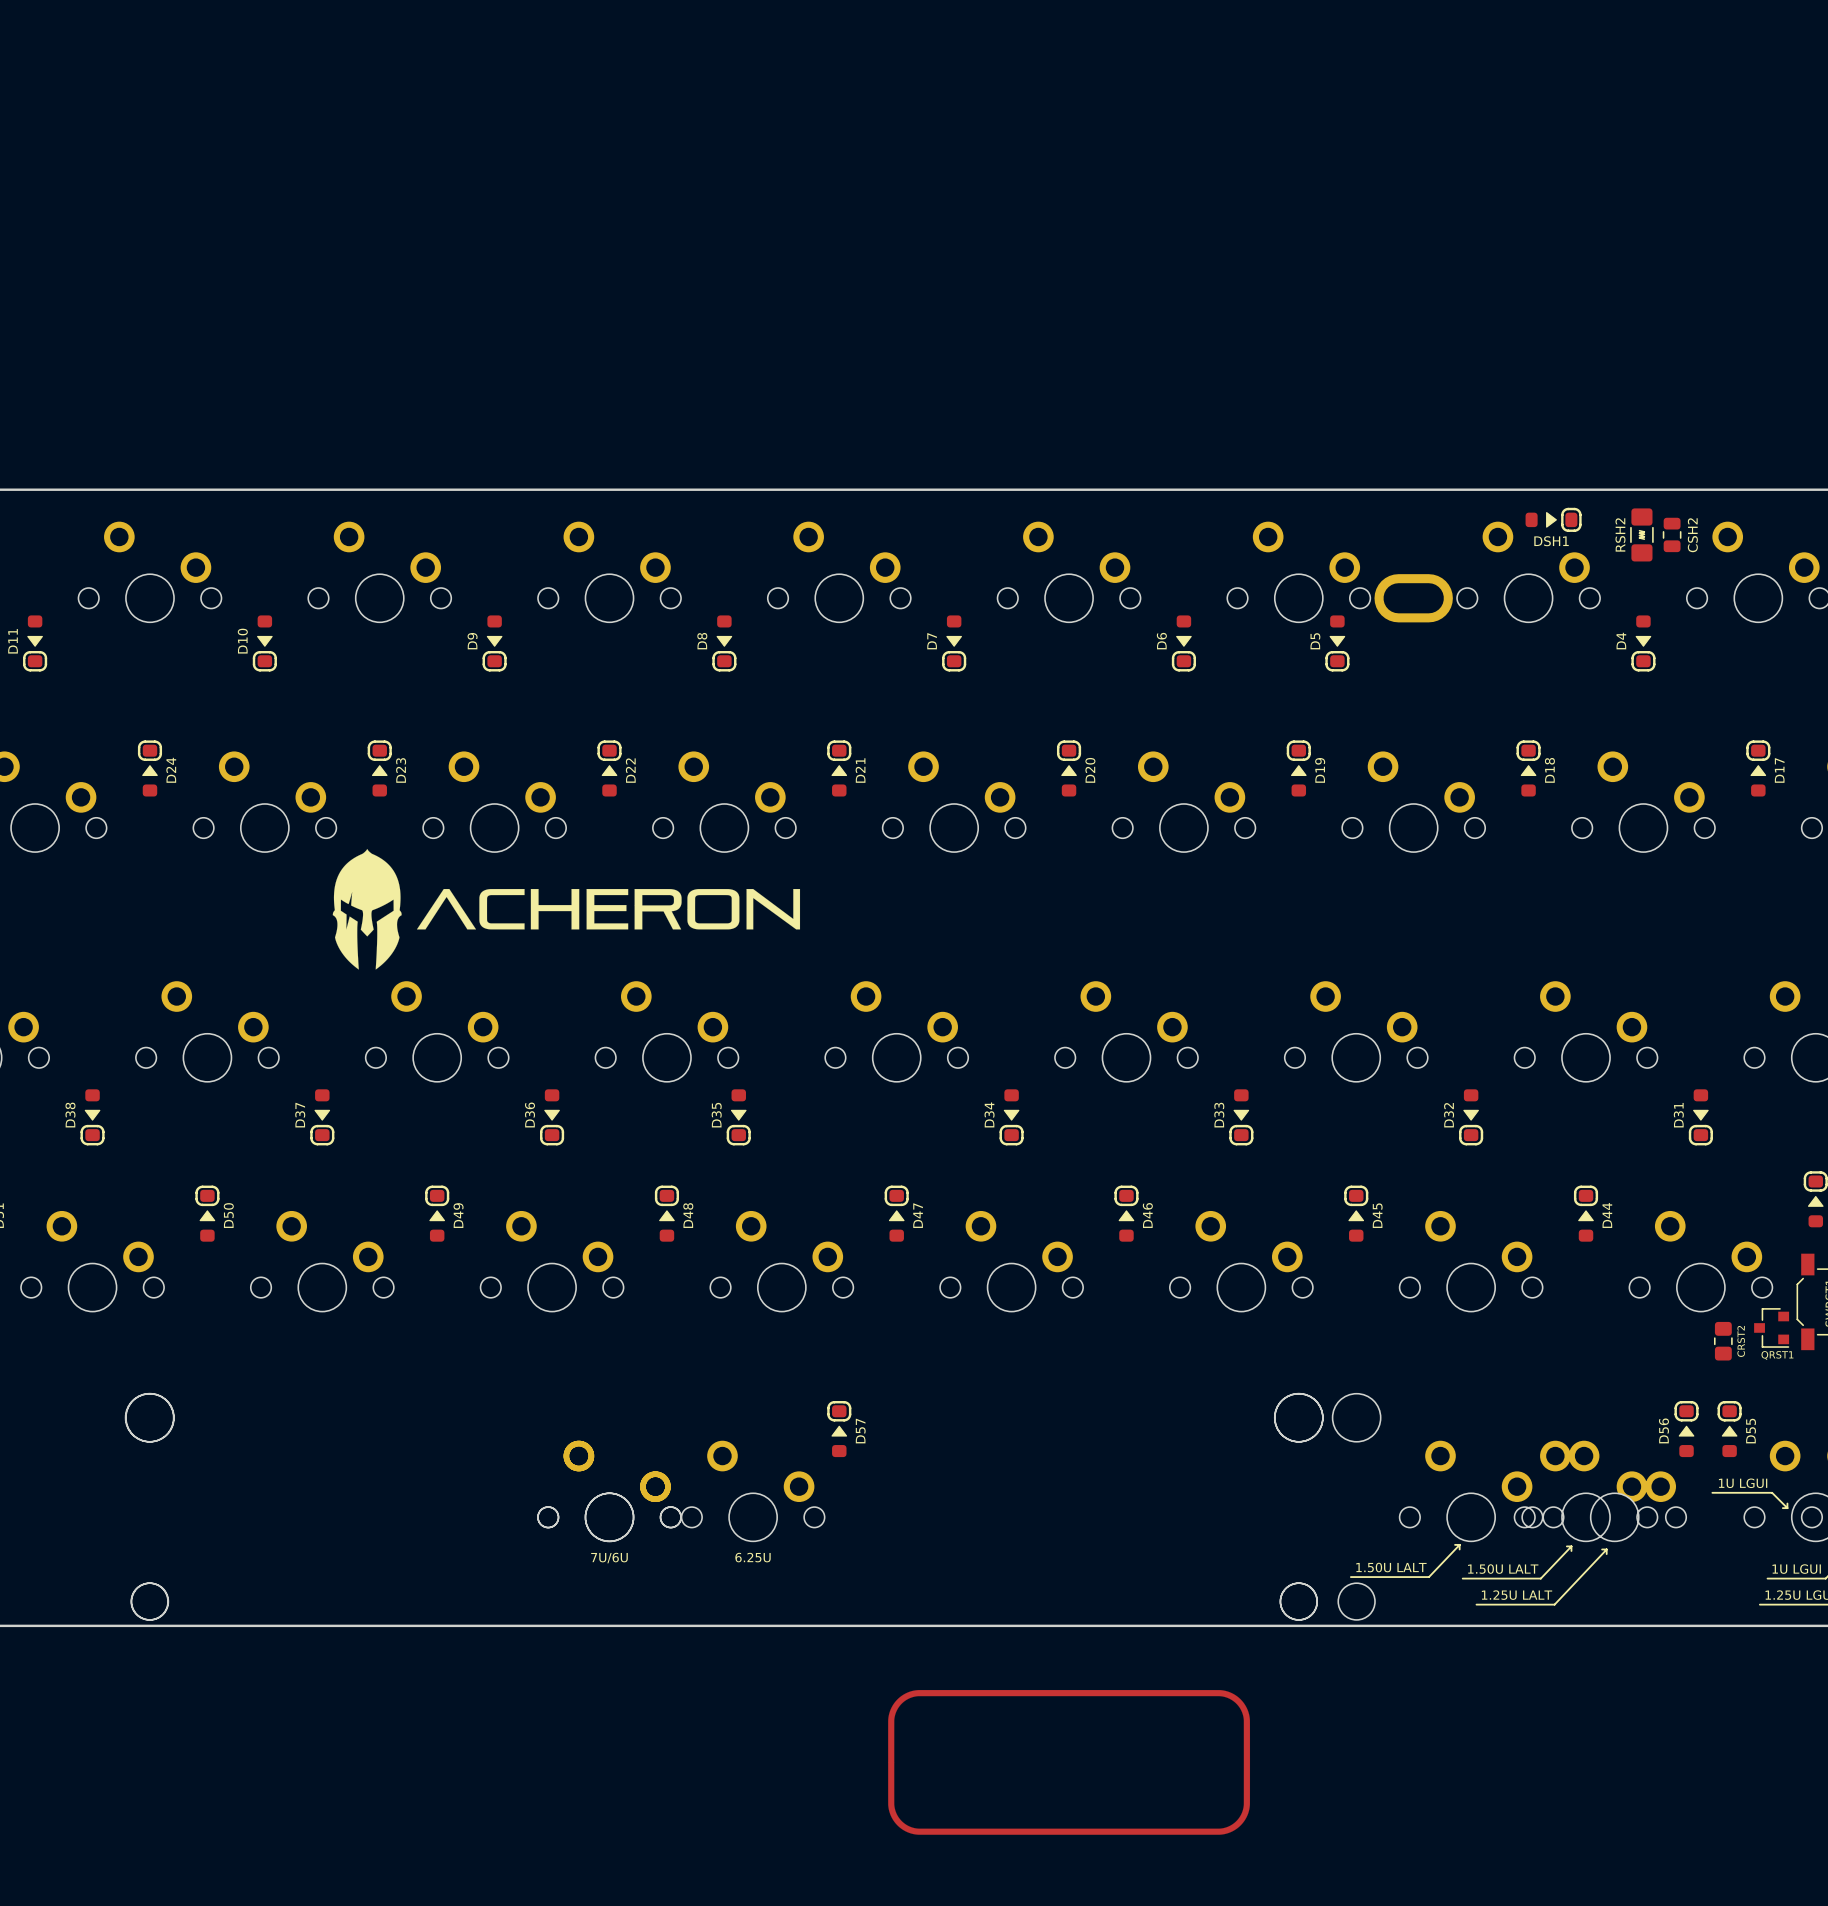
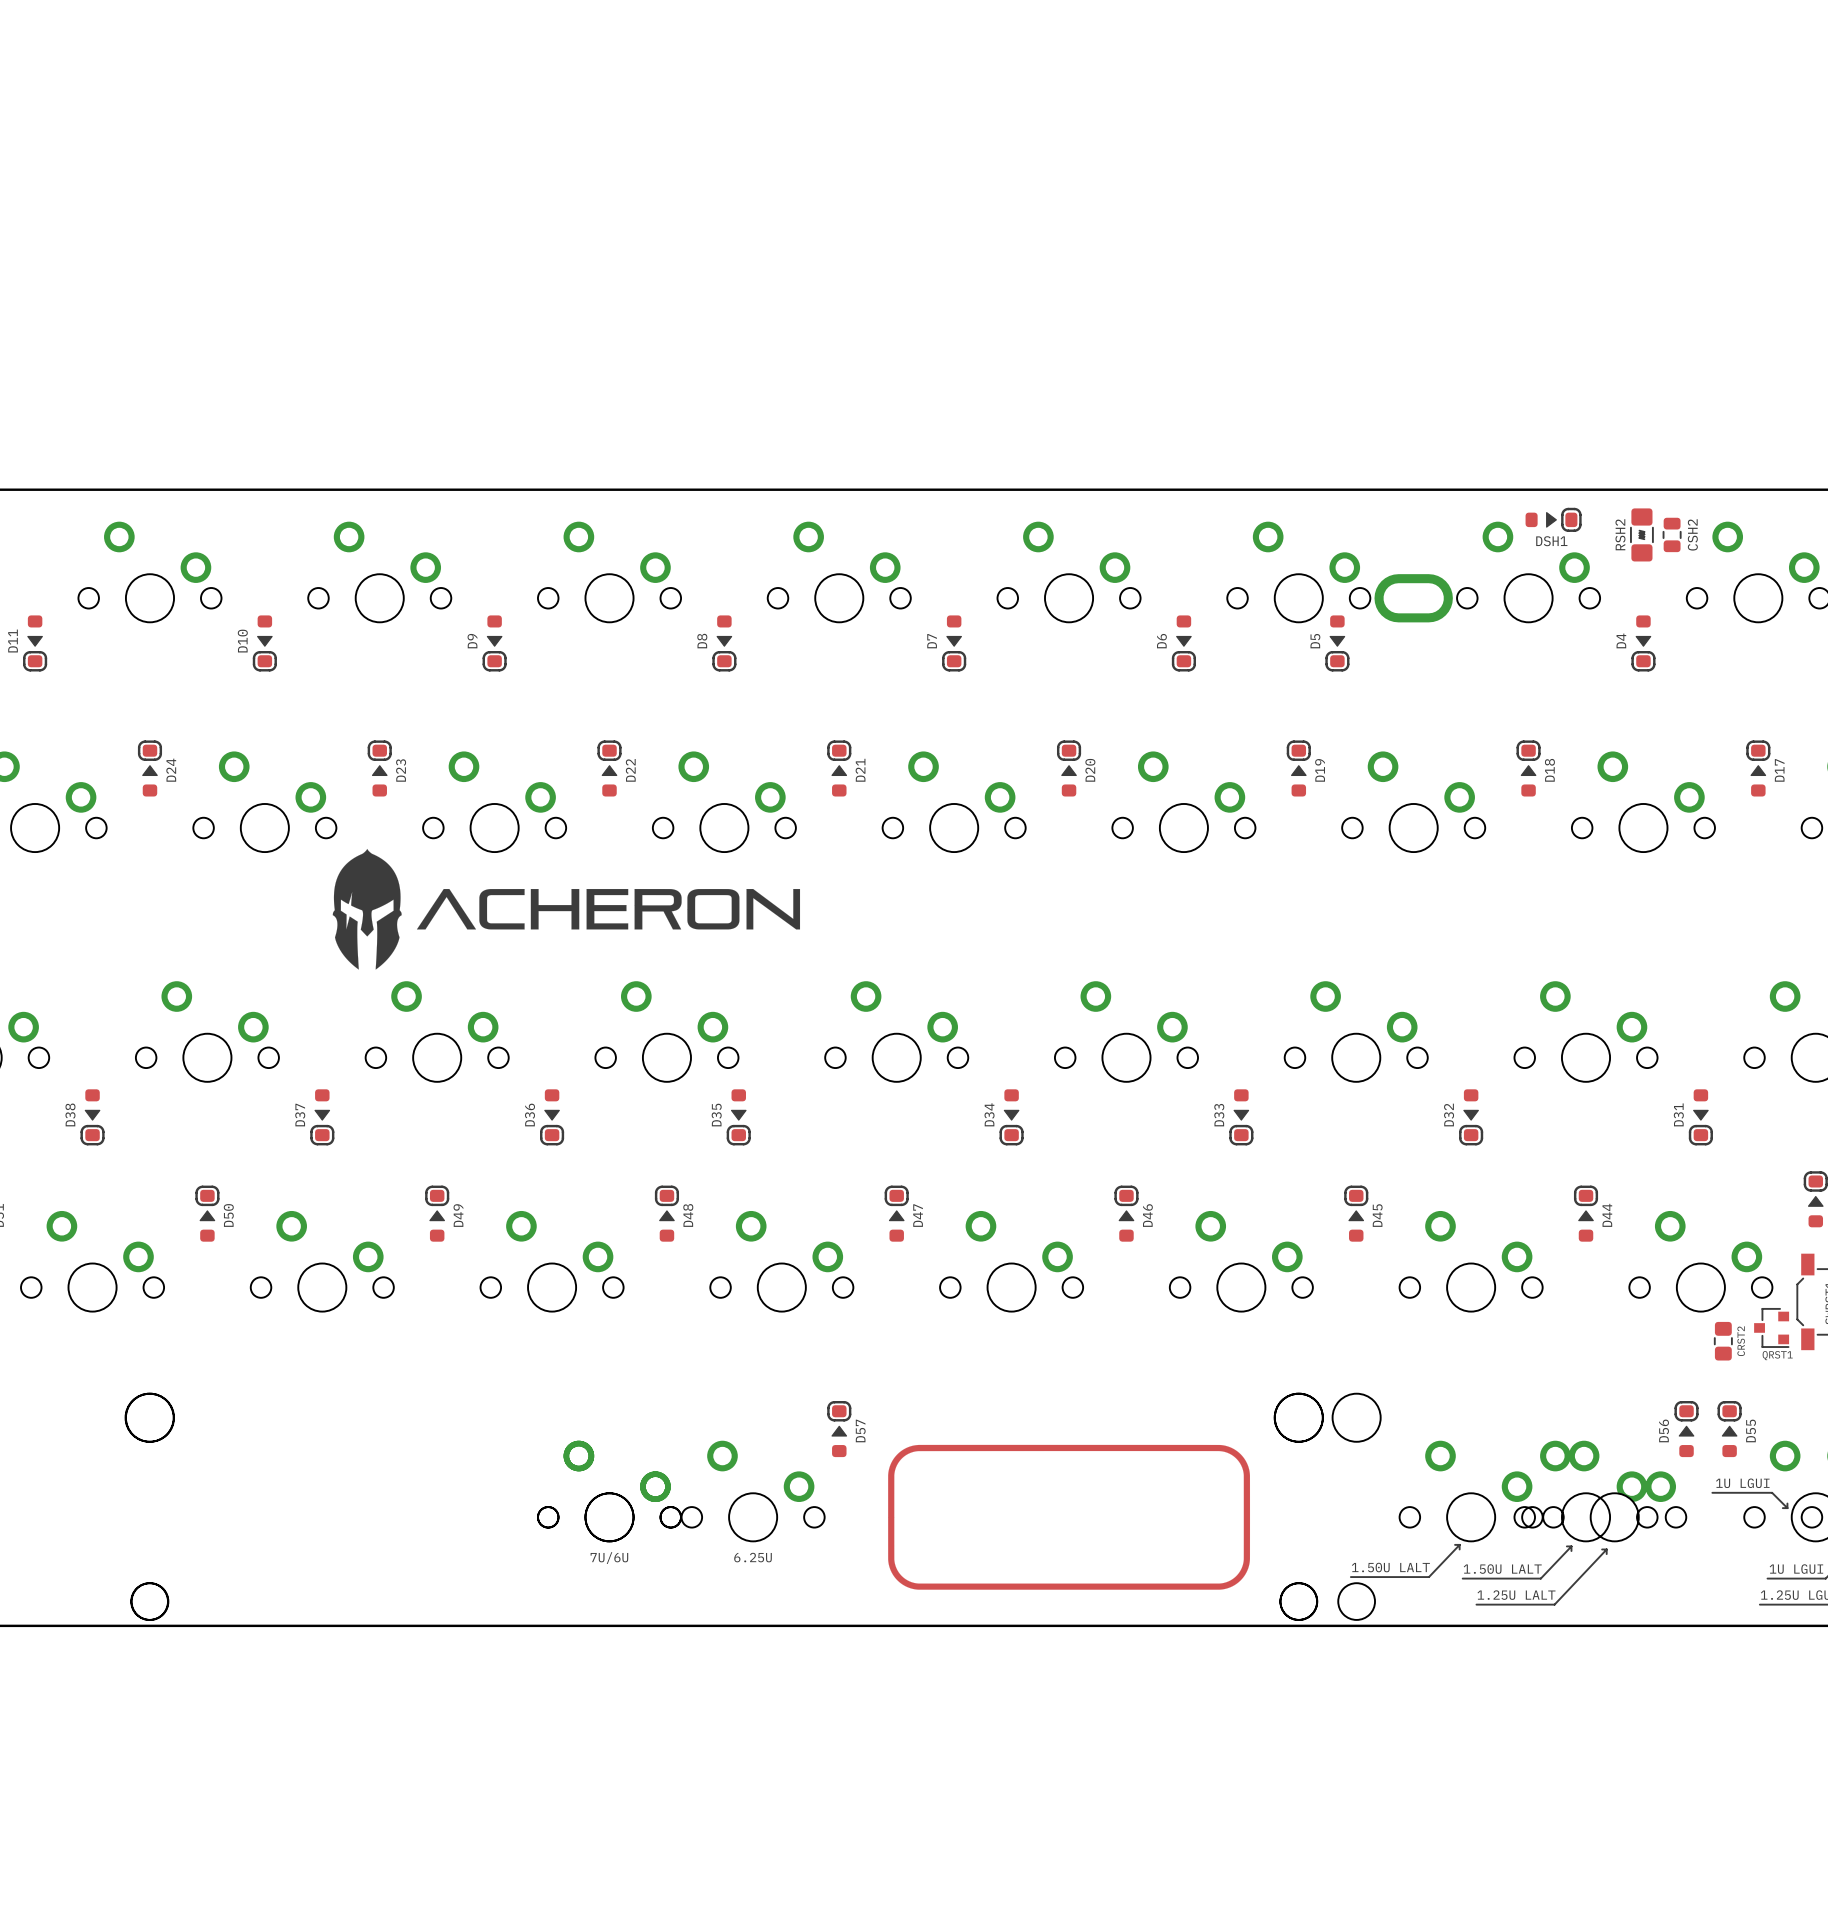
part position: (1069, 1762) -> (1069, 1517)

